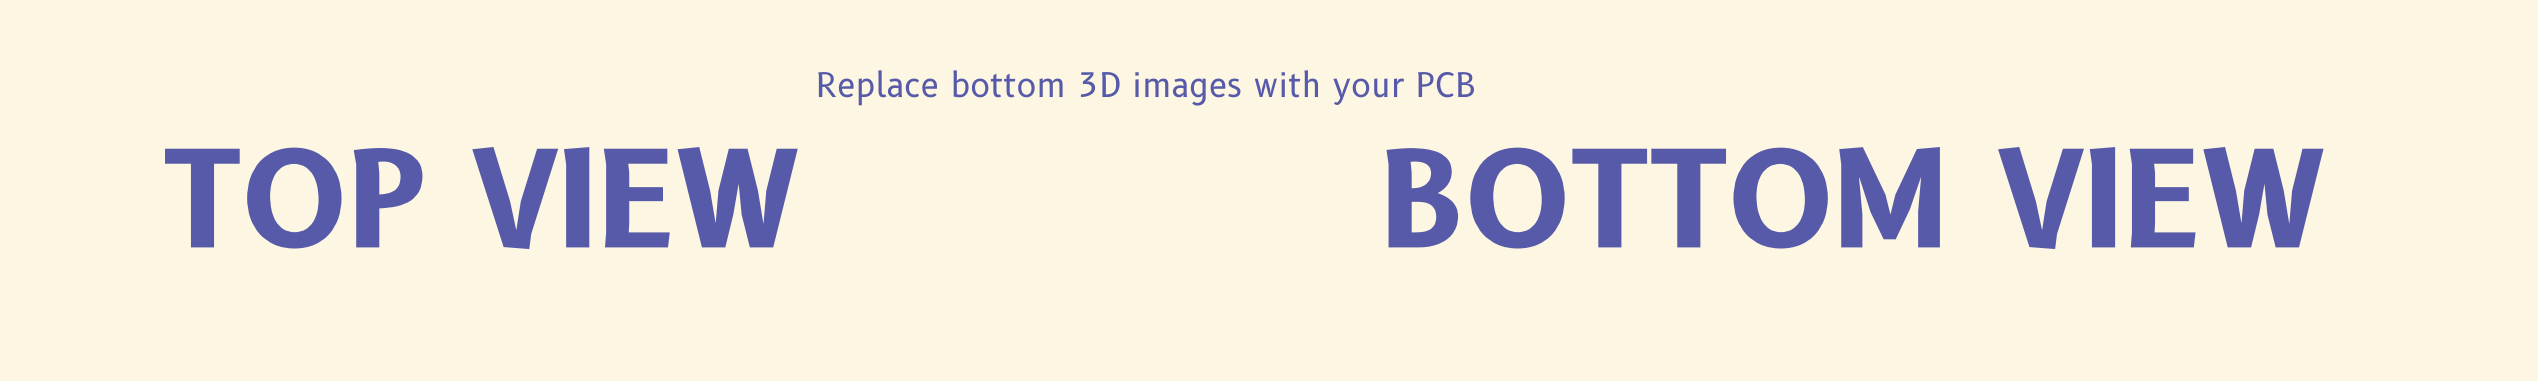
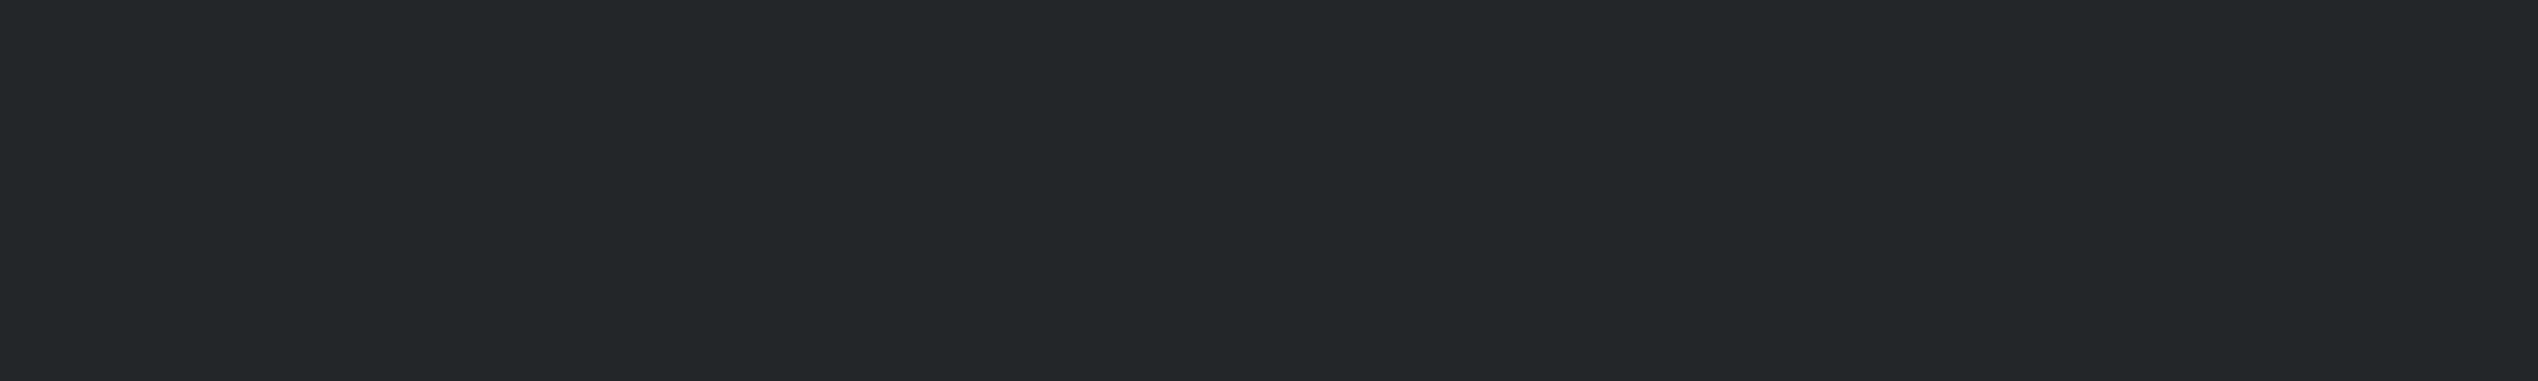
text: Replace bottom 3D images with your PCB (1146, 87) -> none
text: TOP VIEW (481, 198) -> none
text: BOTTOM VIEW (1855, 198) -> none

